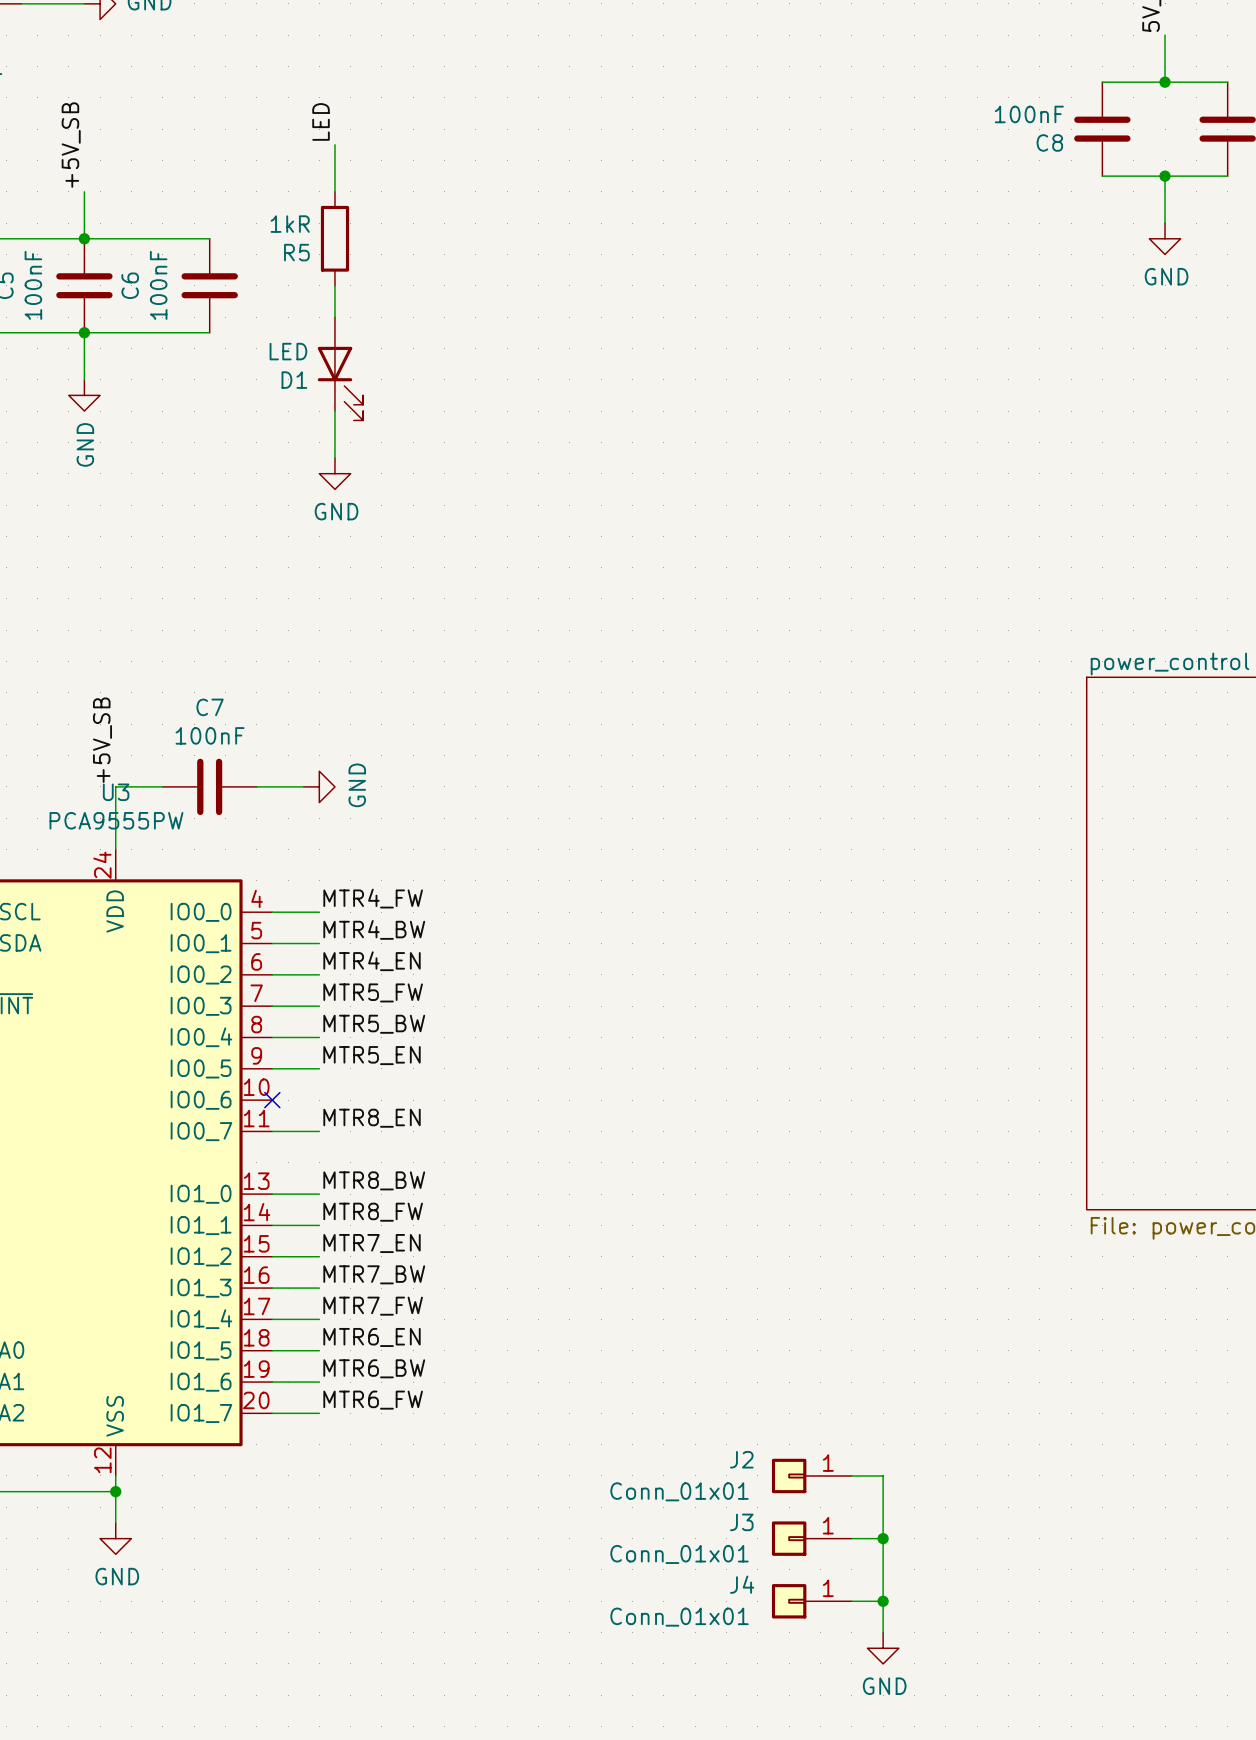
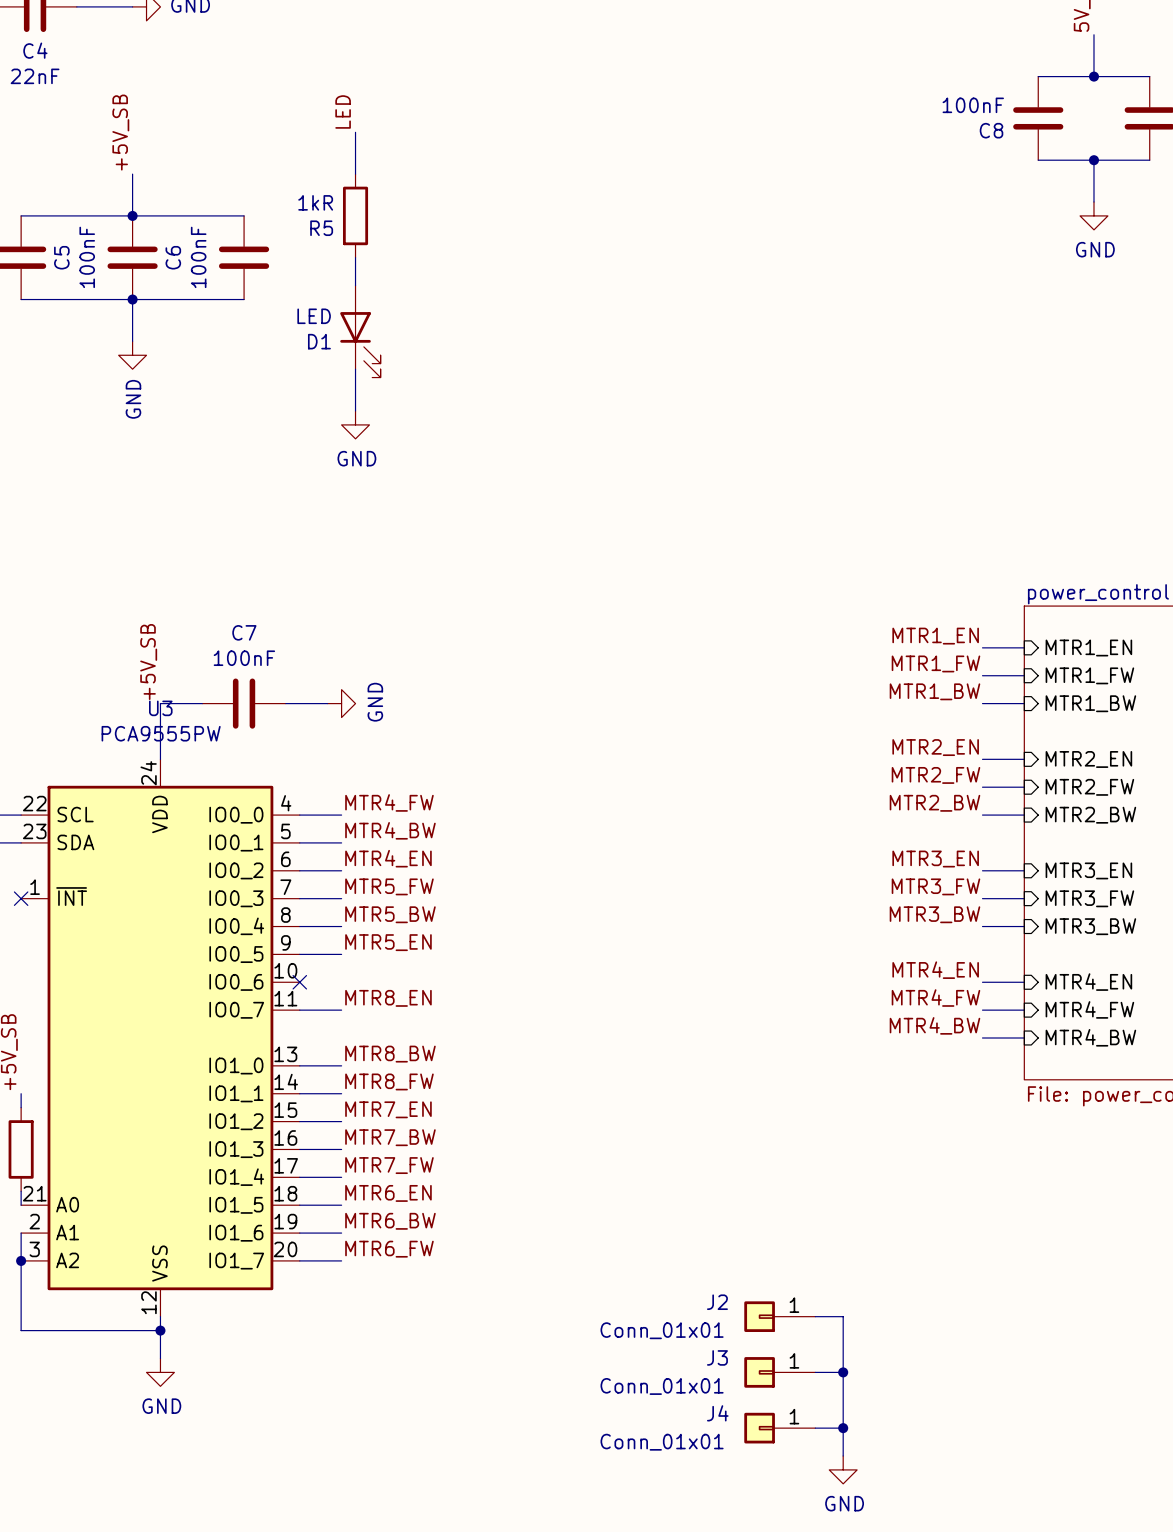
label: none -> MTR1_EN (935, 636)
wire: none -> (982, 647) (1024, 647)
sheet pin: none -> MTR1_EN (1088, 648)
label: none -> MTR1_FW (935, 663)
wire: none -> (982, 675) (1024, 675)
sheet pin: none -> MTR1_FW (1089, 675)
label: none -> MTR1_BW (934, 691)
wire: none -> (982, 703) (1024, 703)
sheet pin: none -> MTR1_BW (1090, 703)
label: none -> MTR2_EN (935, 747)
wire: none -> (982, 759) (1024, 759)
sheet pin: none -> MTR2_EN (1088, 759)
label: none -> MTR2_FW (935, 775)
wire: none -> (982, 787) (1024, 787)
sheet pin: none -> MTR2_FW (1089, 787)
label: none -> MTR2_BW (934, 803)
wire: none -> (982, 815) (1024, 815)
sheet pin: none -> MTR2_BW (1090, 815)
label: none -> MTR3_EN (935, 859)
wire: none -> (982, 870) (1024, 870)
sheet pin: none -> MTR3_EN (1088, 870)
label: none -> MTR3_FW (935, 886)
wire: none -> (982, 898) (1024, 898)
sheet pin: none -> MTR3_FW (1089, 898)
label: none -> MTR3_BW (934, 914)
wire: none -> (982, 926) (1024, 926)
sheet pin: none -> MTR3_BW (1090, 926)
label: none -> MTR4_EN (935, 970)
sheet pin: none -> MTR4_EN (1088, 982)
wire: none -> (982, 982) (1024, 982)
label: none -> MTR4_FW (935, 998)
wire: none -> (982, 1010) (1024, 1010)
sheet pin: none -> MTR4_FW (1089, 1009)
label: none -> MTR4_BW (934, 1025)
wire: none -> (982, 1038) (1024, 1038)
sheet pin: none -> MTR4_BW (1090, 1037)

